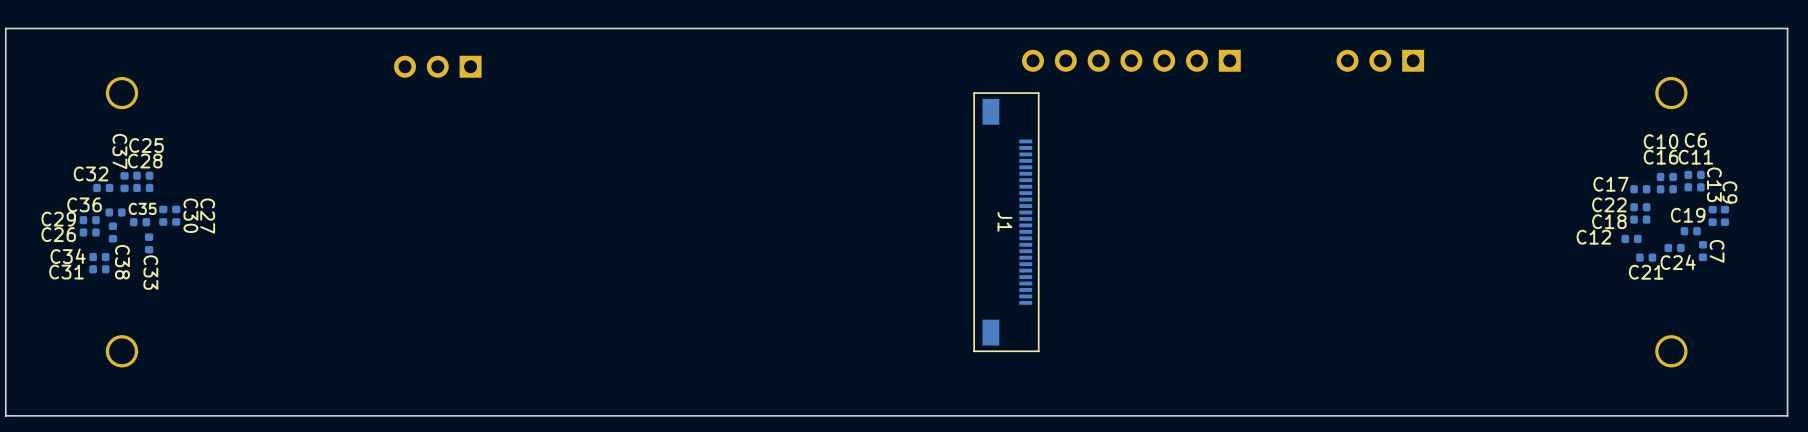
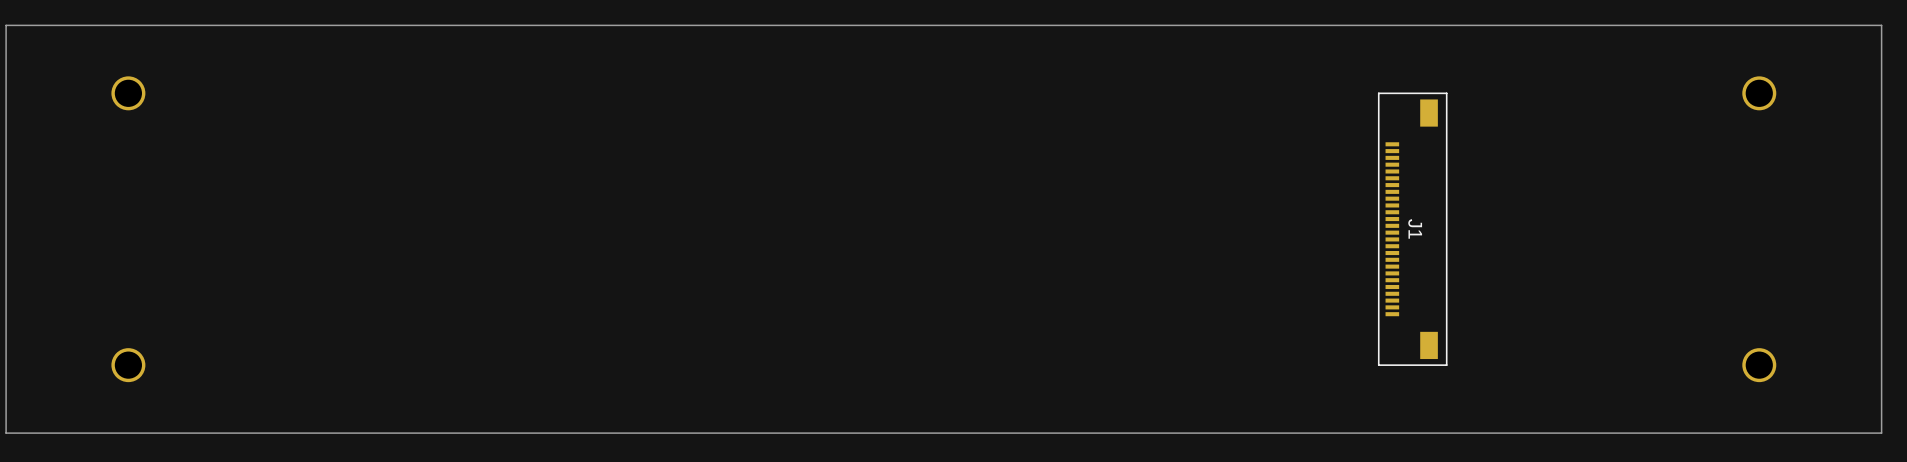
part: (1131, 60) -> none
part: (1380, 60) -> none
part: (437, 66) -> none
C6: (1694, 174) -> none
C25: (143, 175) -> none
C10: (1666, 176) -> none
C37: (124, 182) -> none
C32: (103, 187) -> none
C28: (143, 187) -> none
C11: (1694, 187) -> none
C17: (1640, 189) -> none
C16: (1666, 189) -> none
C22: (1640, 207) -> none
C36: (115, 212) -> none
C30: (163, 215) -> none
C27: (176, 215) -> none
C13: (1712, 215) -> none
C9: (1724, 215) -> none
C18: (1640, 219) -> none
C29: (89, 220) -> none
C35: (140, 222) -> none
J1 rotation: 0° (1006, 222) -> 180° (1412, 229)
J1 position: (1006, 222) -> (1412, 229)
C19: (1690, 231) -> none
C26: (89, 232) -> none
C38: (112, 232) -> none
C12: (1631, 238) -> none
C33: (149, 243) -> none
C24: (1674, 248) -> none
C7: (1702, 251) -> none
C34: (99, 257) -> none
C21: (1646, 257) -> none
C31: (99, 269) -> none

